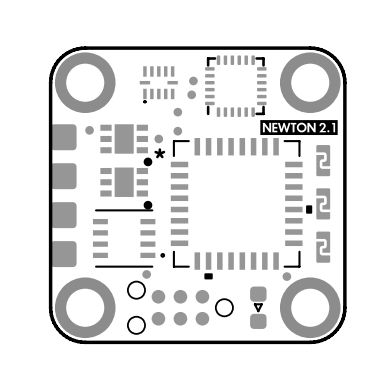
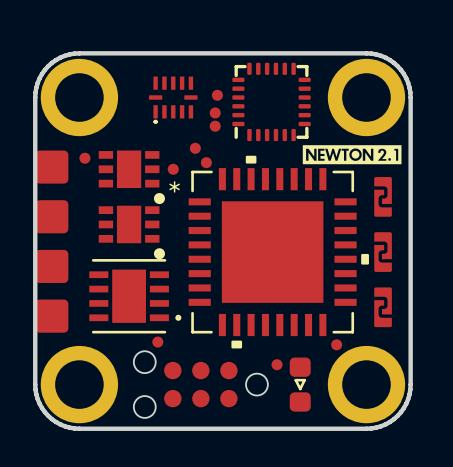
part: none -> (215, 126)
part: (177, 112) -> none
part: none -> (195, 148)
part: (177, 131) -> none
part: none -> (206, 162)
part footprint: [170, 138, 313, 280] -> [188, 155, 369, 349]
part footprint: [92, 209, 166, 268] -> [89, 259, 182, 334]
part: none -> (277, 364)

